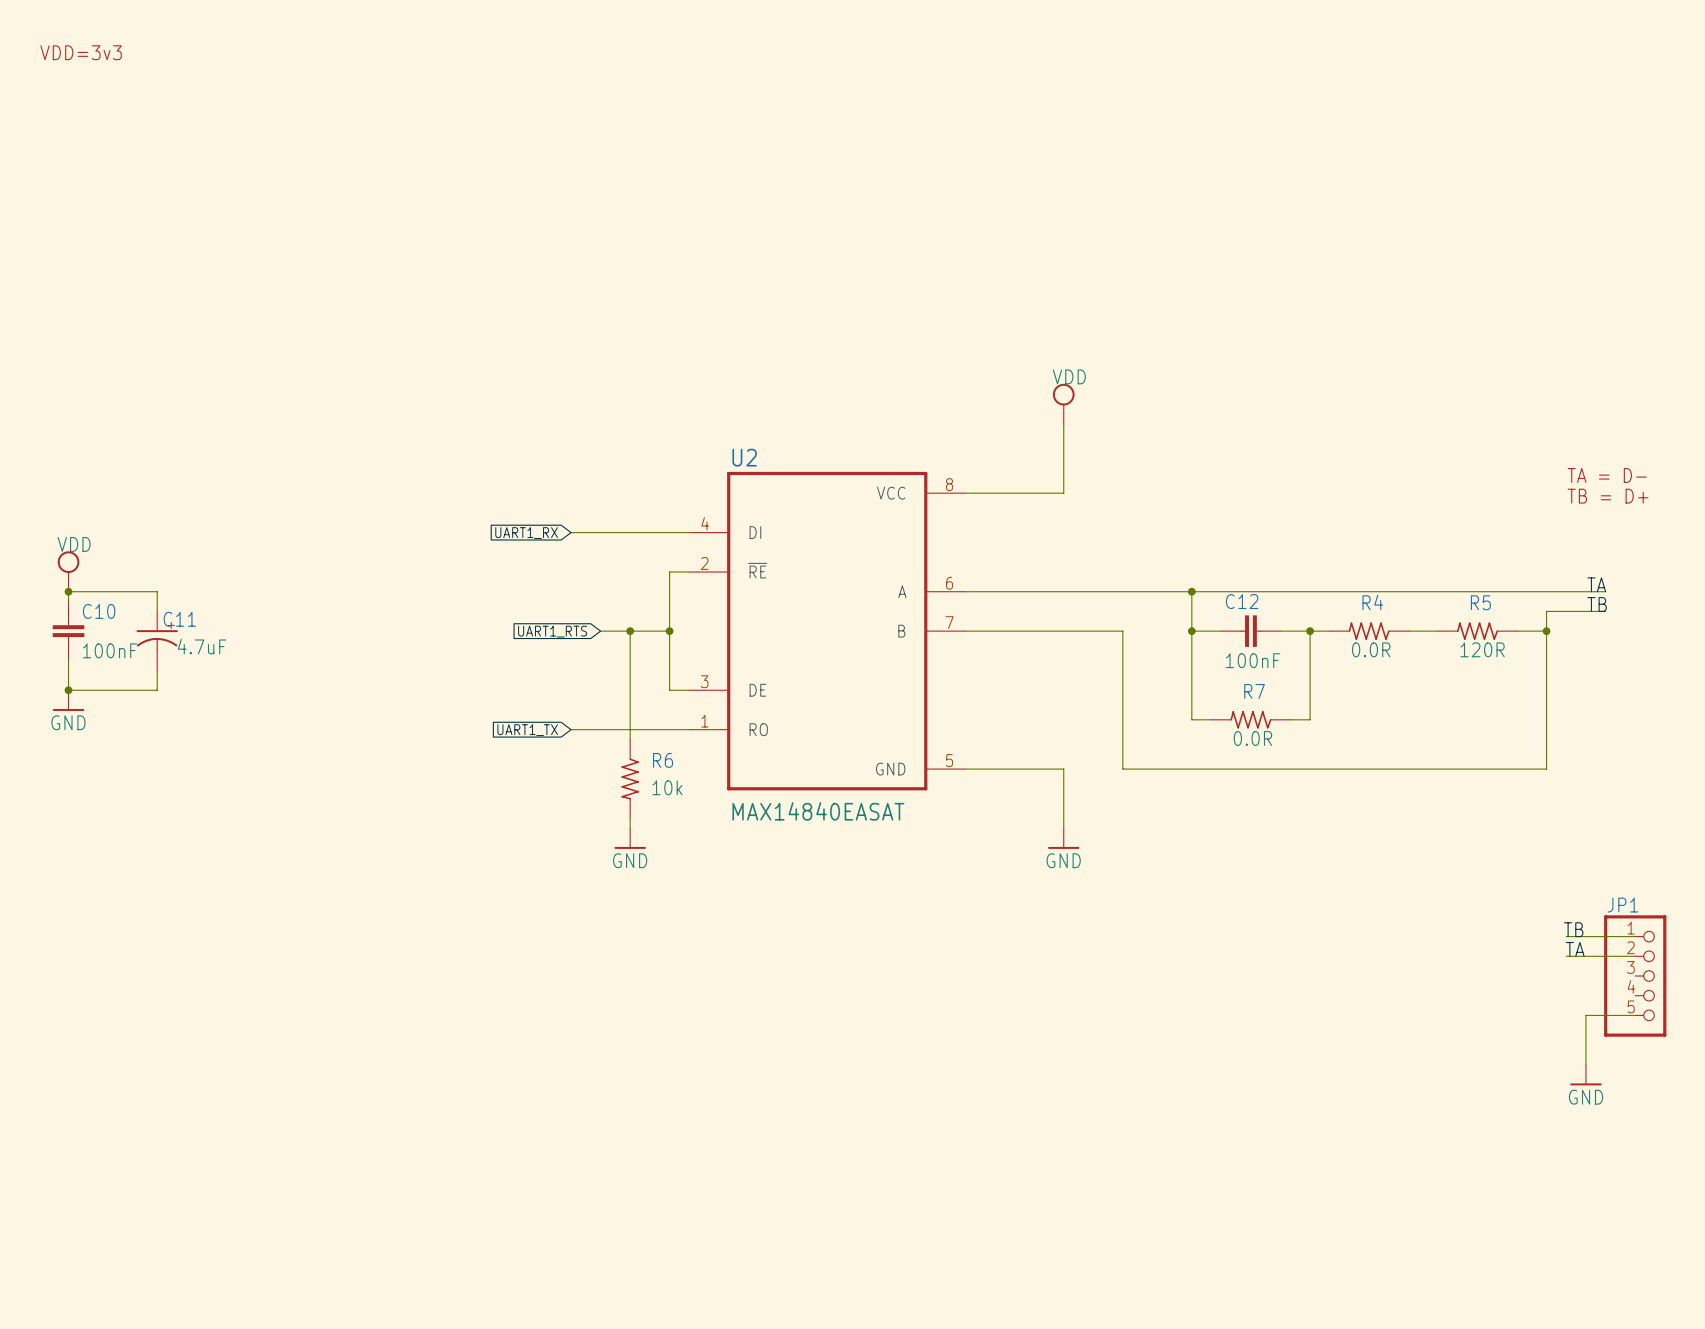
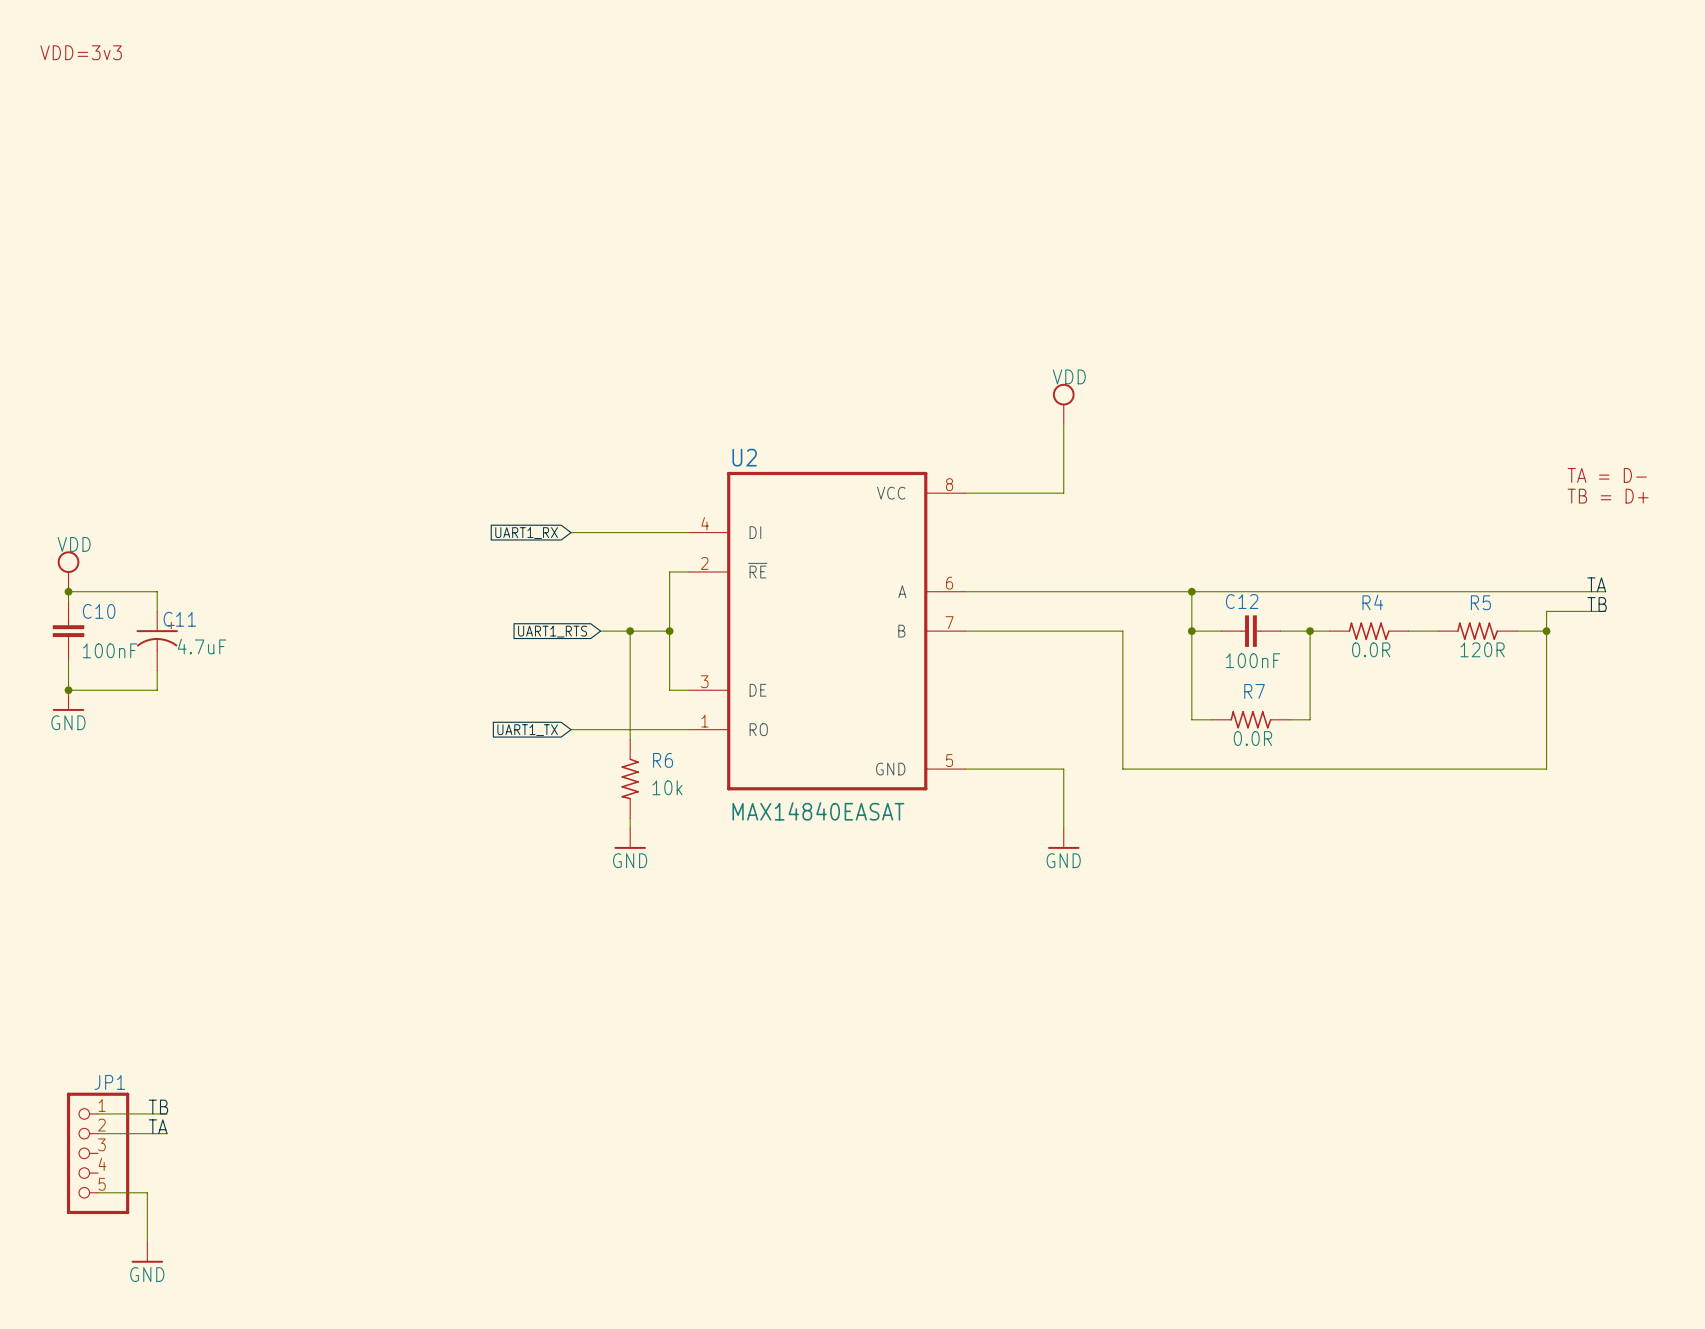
label: TB (1573, 929) -> none
wire: (1566, 936) (1635, 936) -> none
label: TA (1575, 949) -> none
wire: (1566, 956) (1635, 956) -> none
JP1 flip: as is (1635, 976) -> left-right (98, 1153)
JP1 position: (1635, 976) -> (98, 1153)
wire: (1635, 1015) (1585, 1015) (1585, 1064) -> none
power symbol: GND (1585, 1075) -> none
label: none -> TB (158, 1107)
wire: none -> (98, 1113) (167, 1113)
label: none -> TA (158, 1126)
wire: none -> (98, 1133) (167, 1133)
wire: none -> (98, 1192) (147, 1192) (147, 1242)
power symbol: none -> GND (147, 1252)

